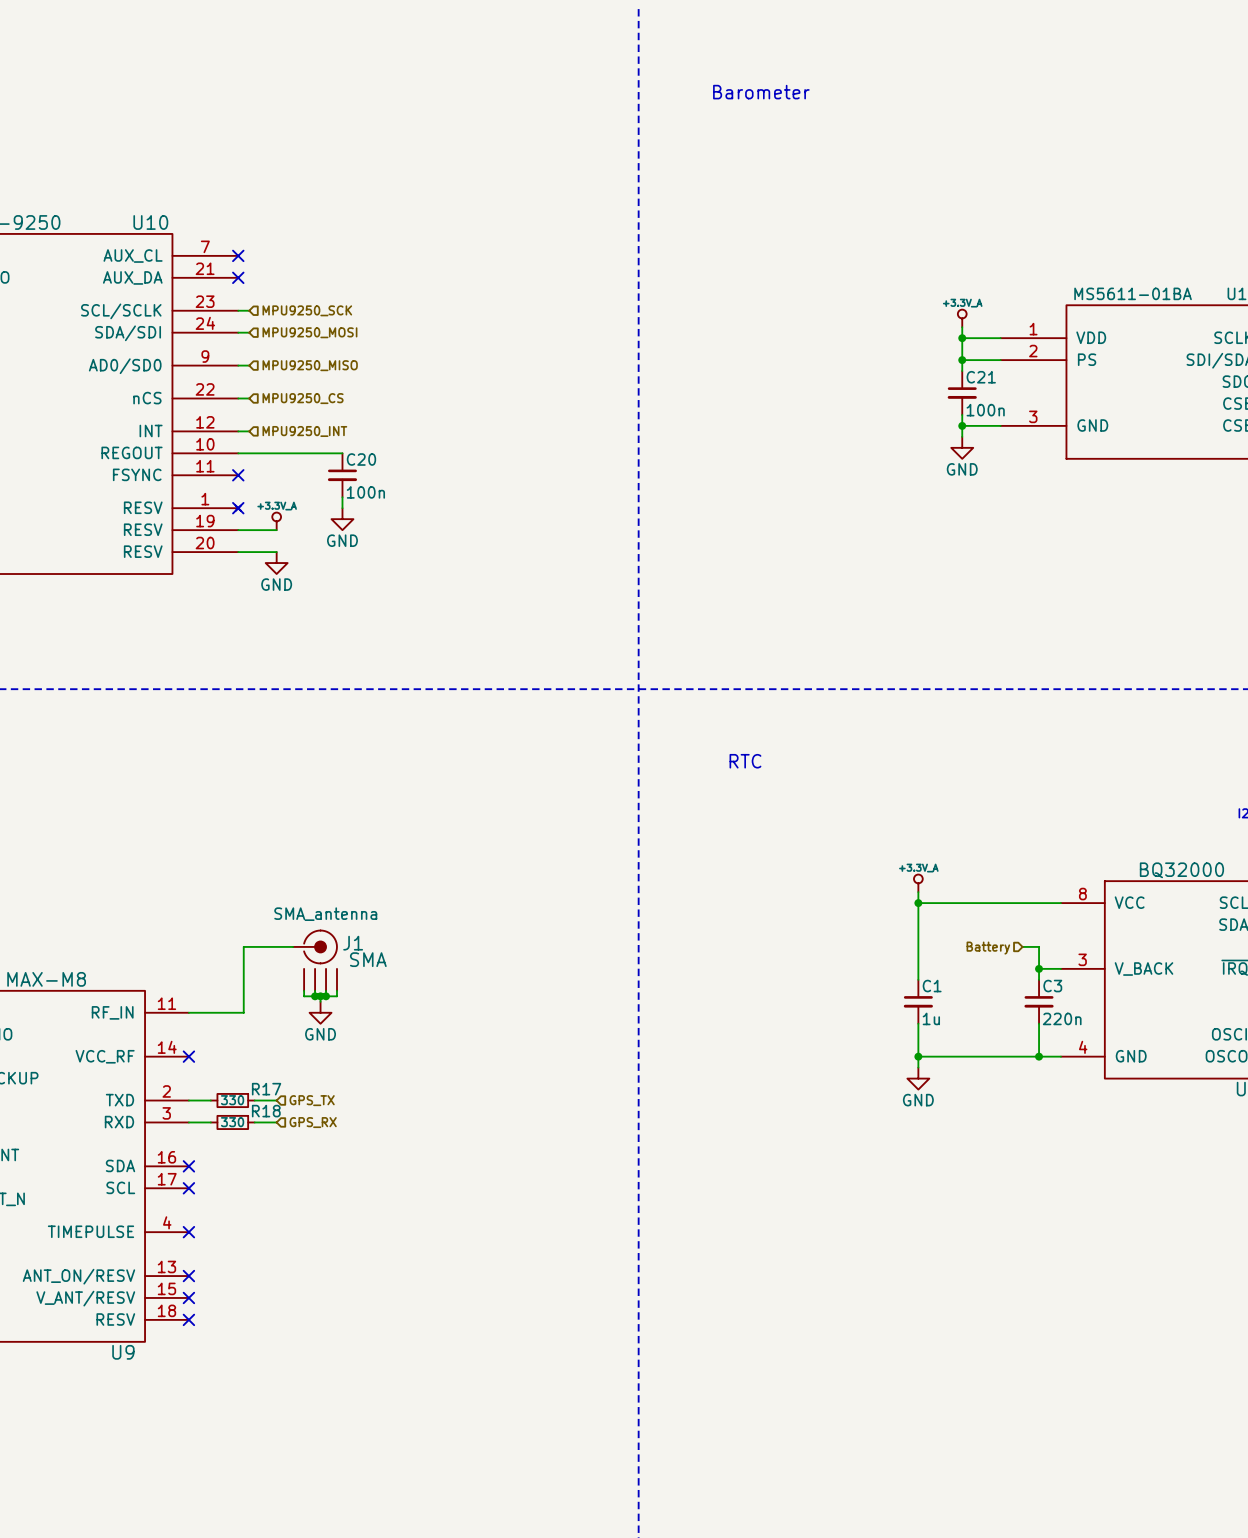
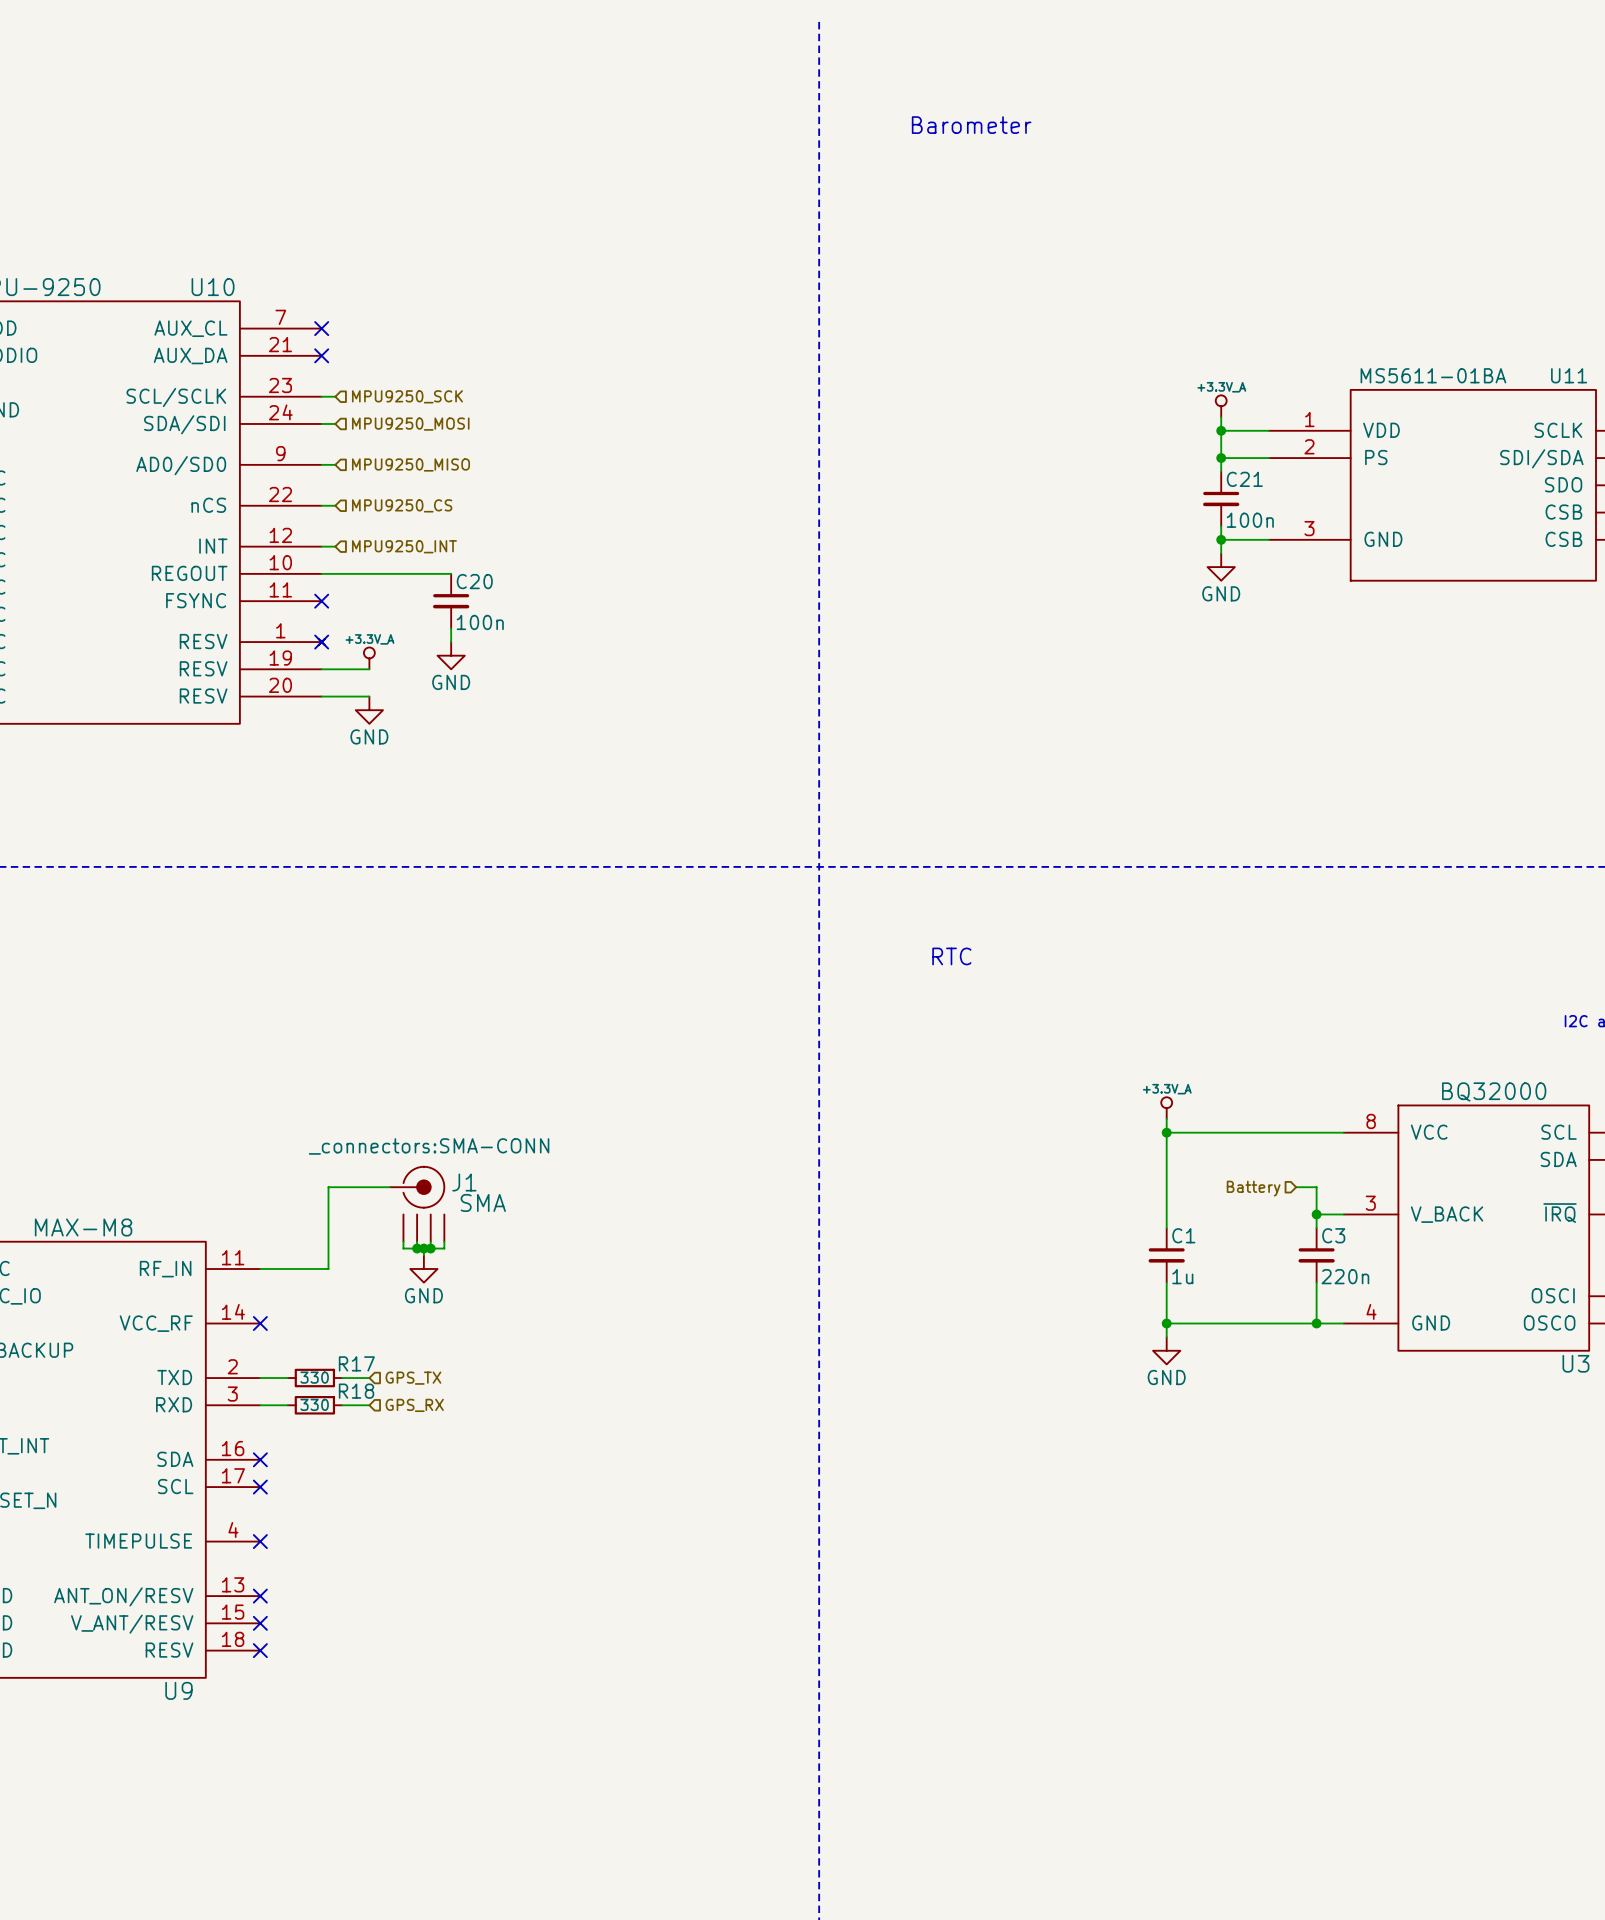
J1 text: SMA_antenna (325, 914) -> _connectors:SMA-CONN (429, 1146)

